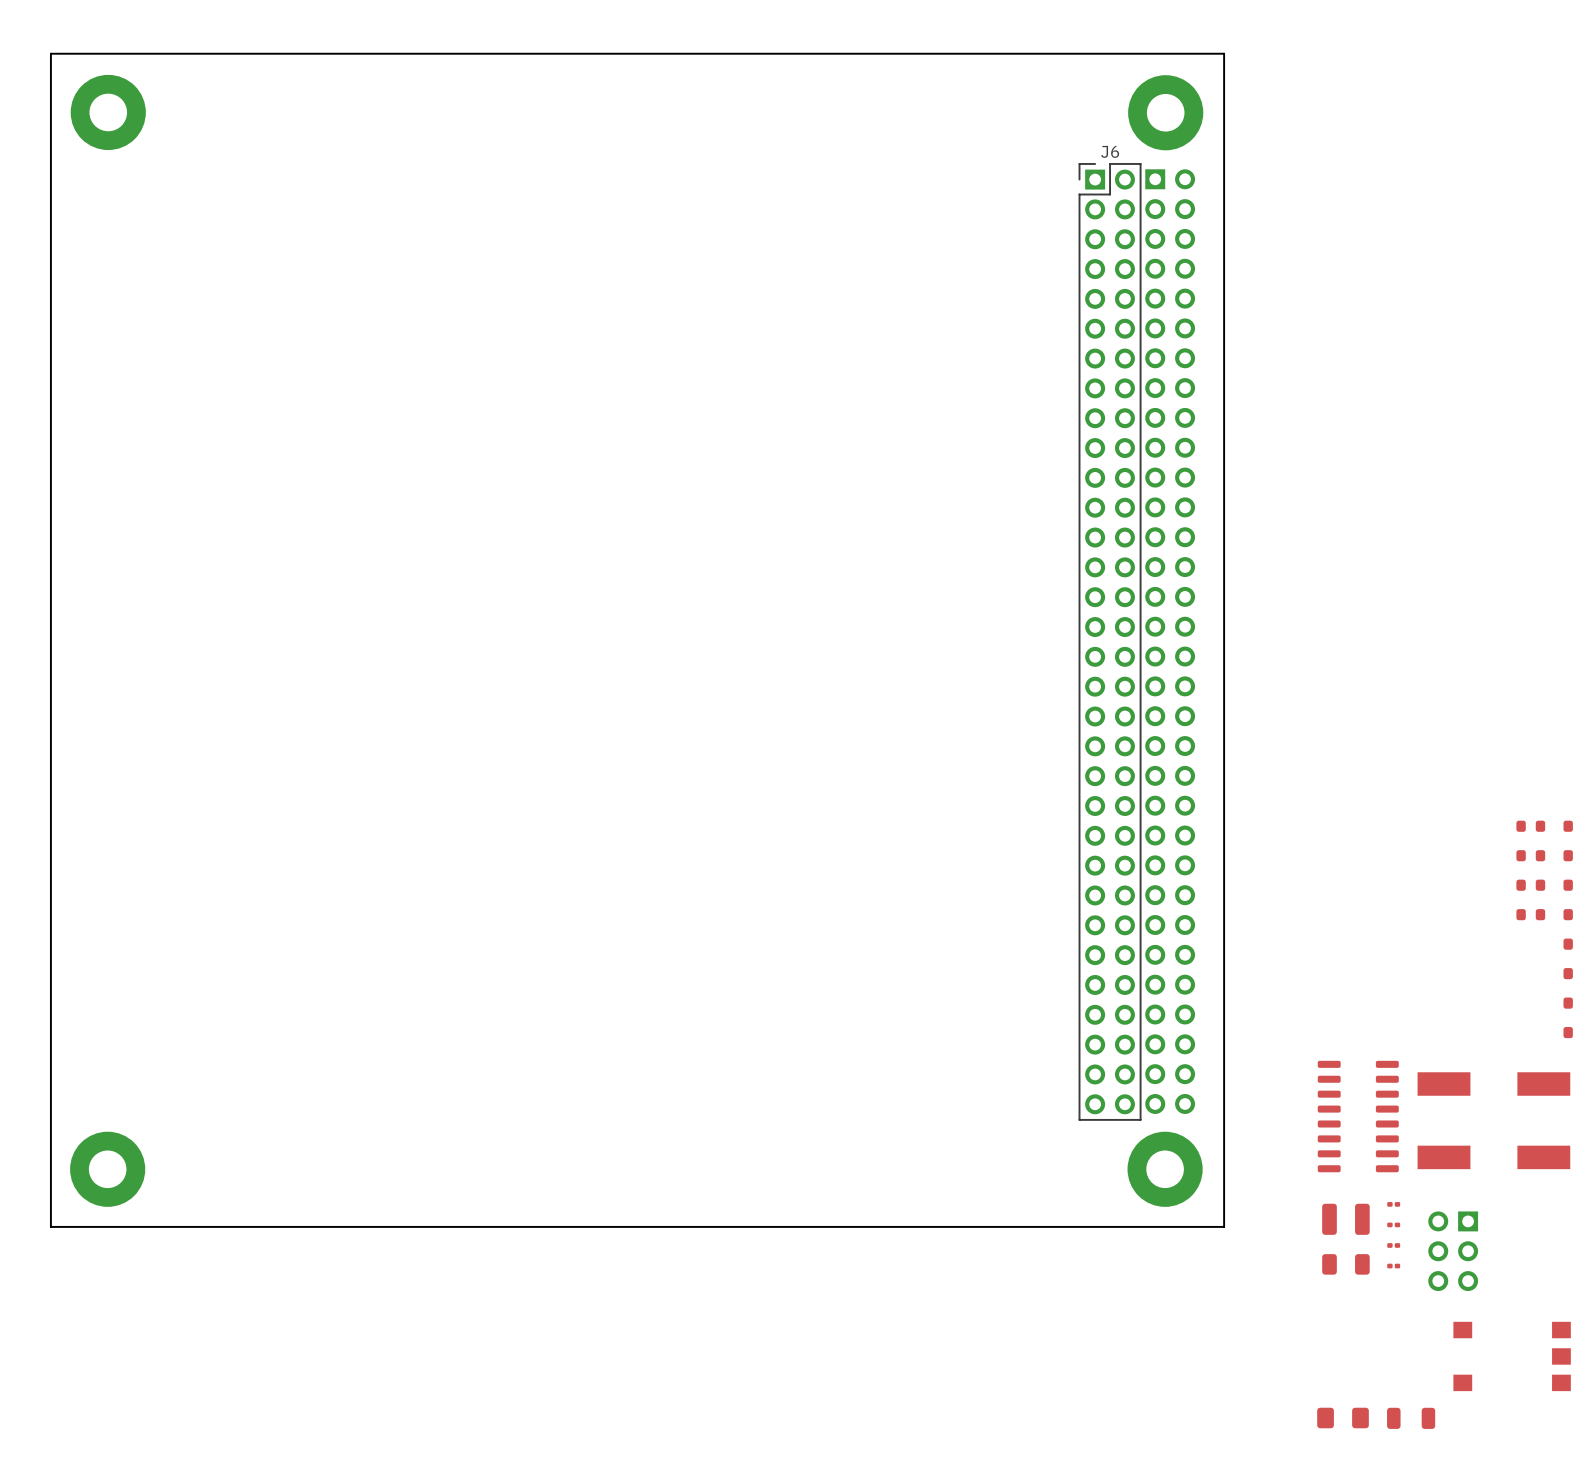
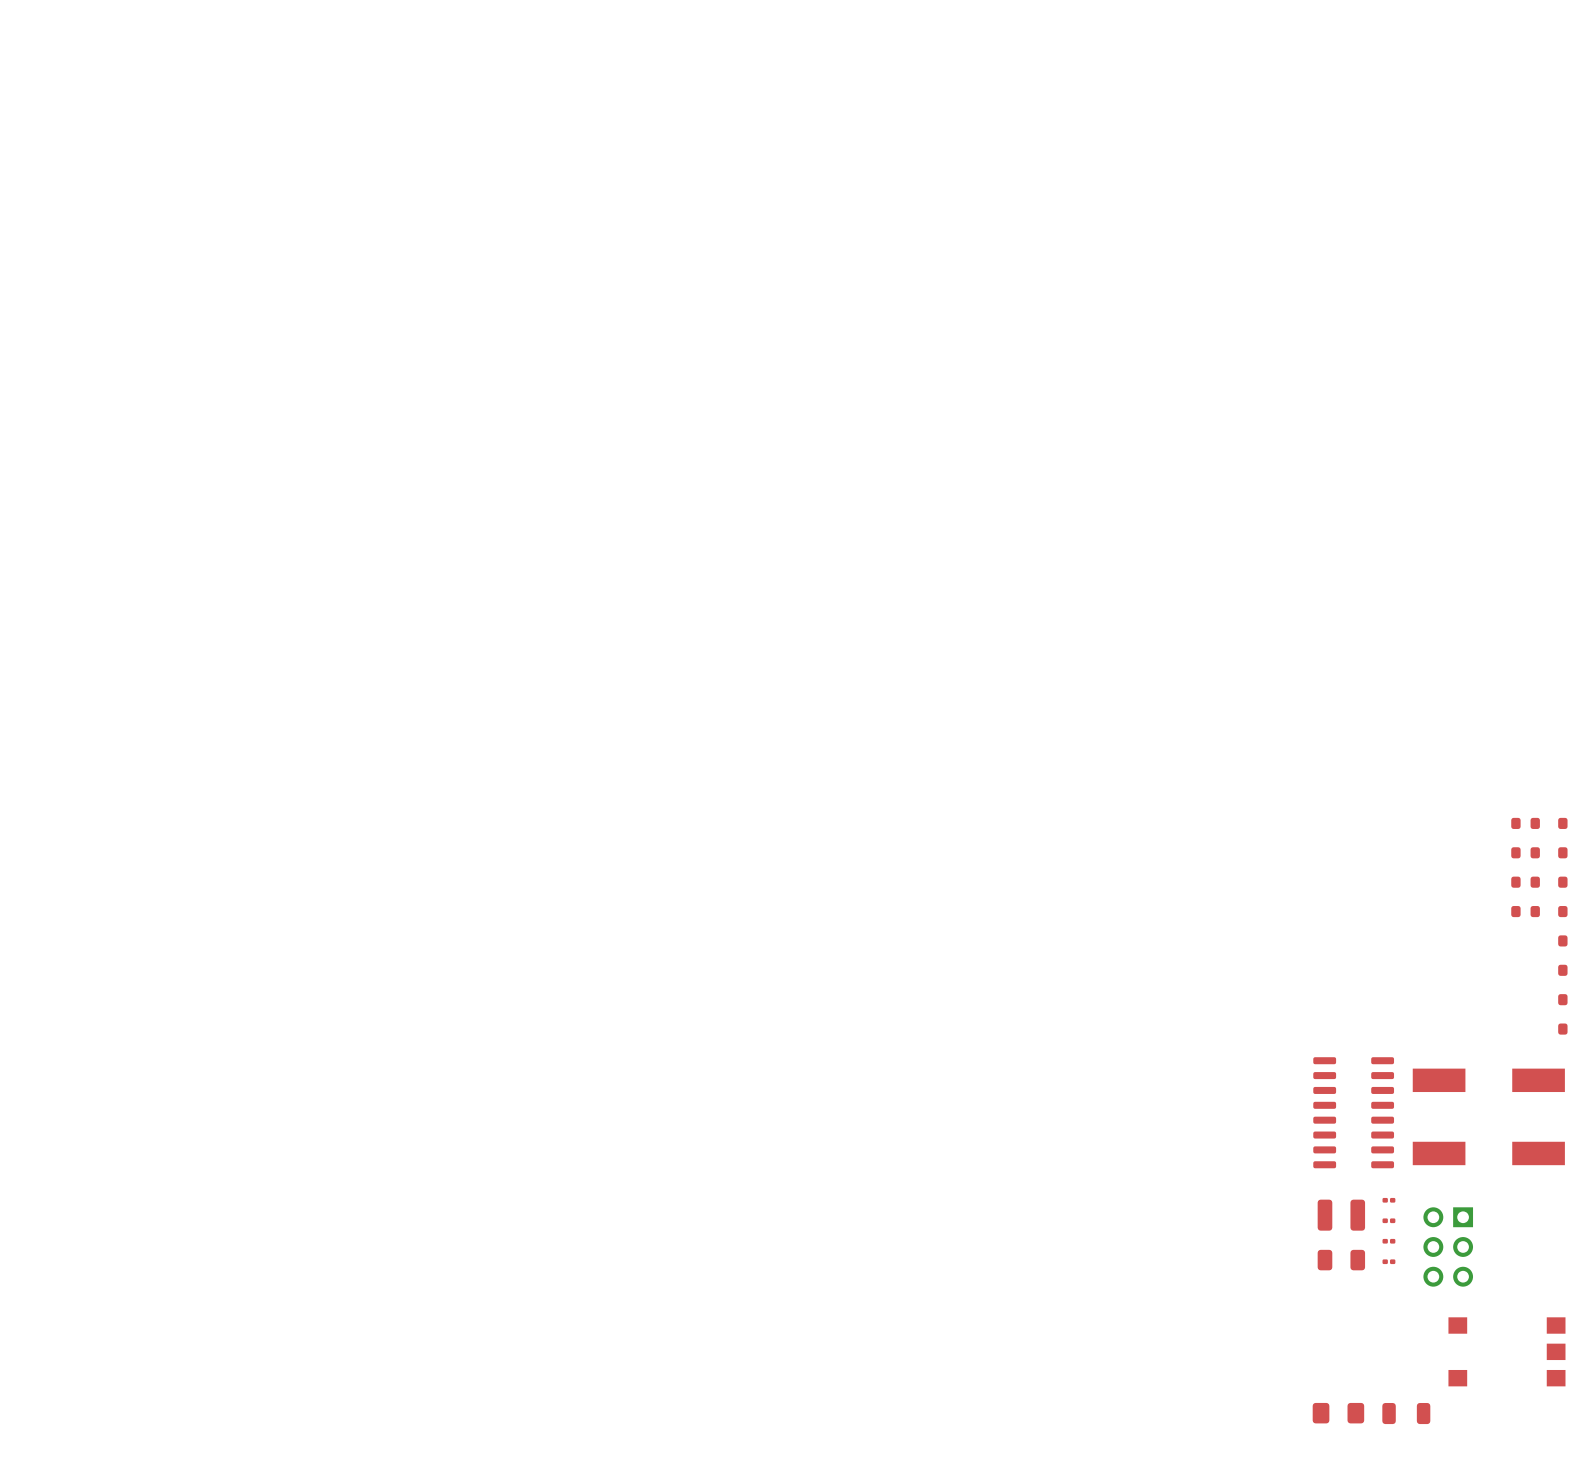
board edge: (1224, 53) (1224, 1226) (50, 1226) (50, 53) (1224, 53) -> none
part: (108, 112) -> none
part: (1165, 112) -> none
J6: (1110, 641) -> none
part: (1170, 641) -> none
part: (107, 1169) -> none
part: (1165, 1169) -> none

